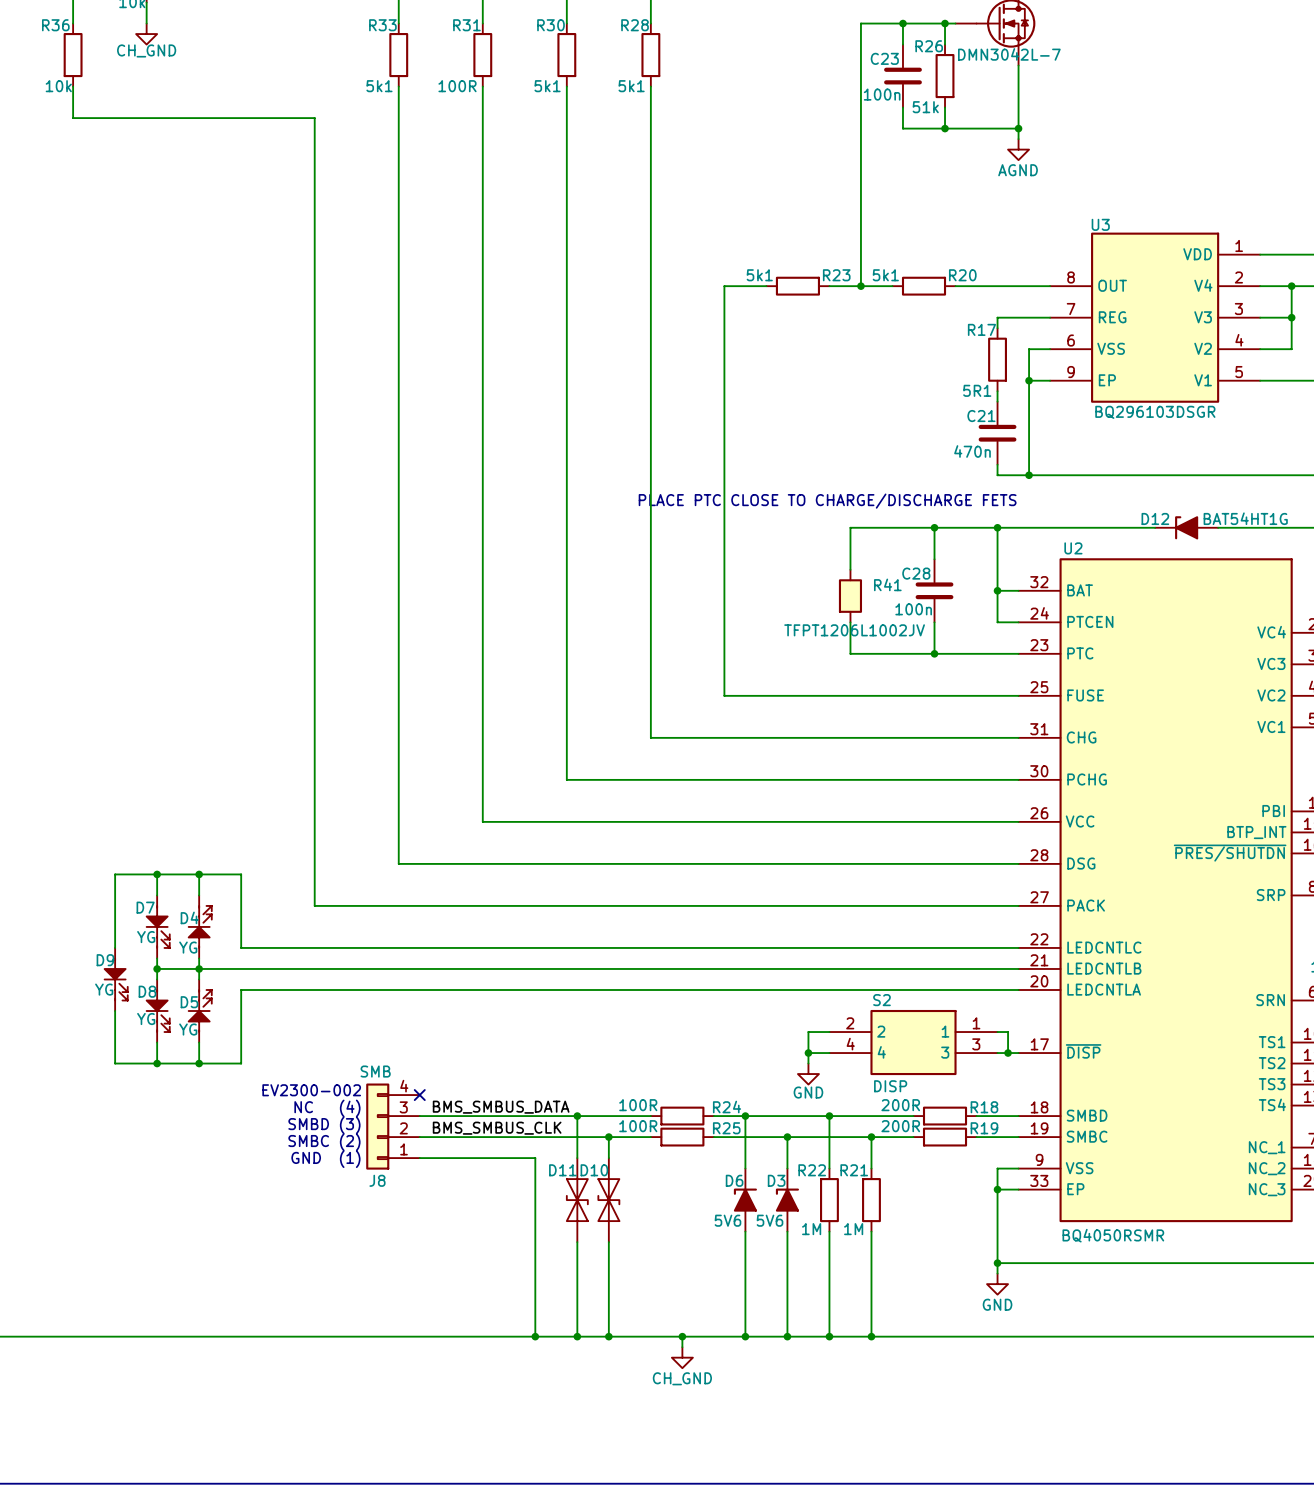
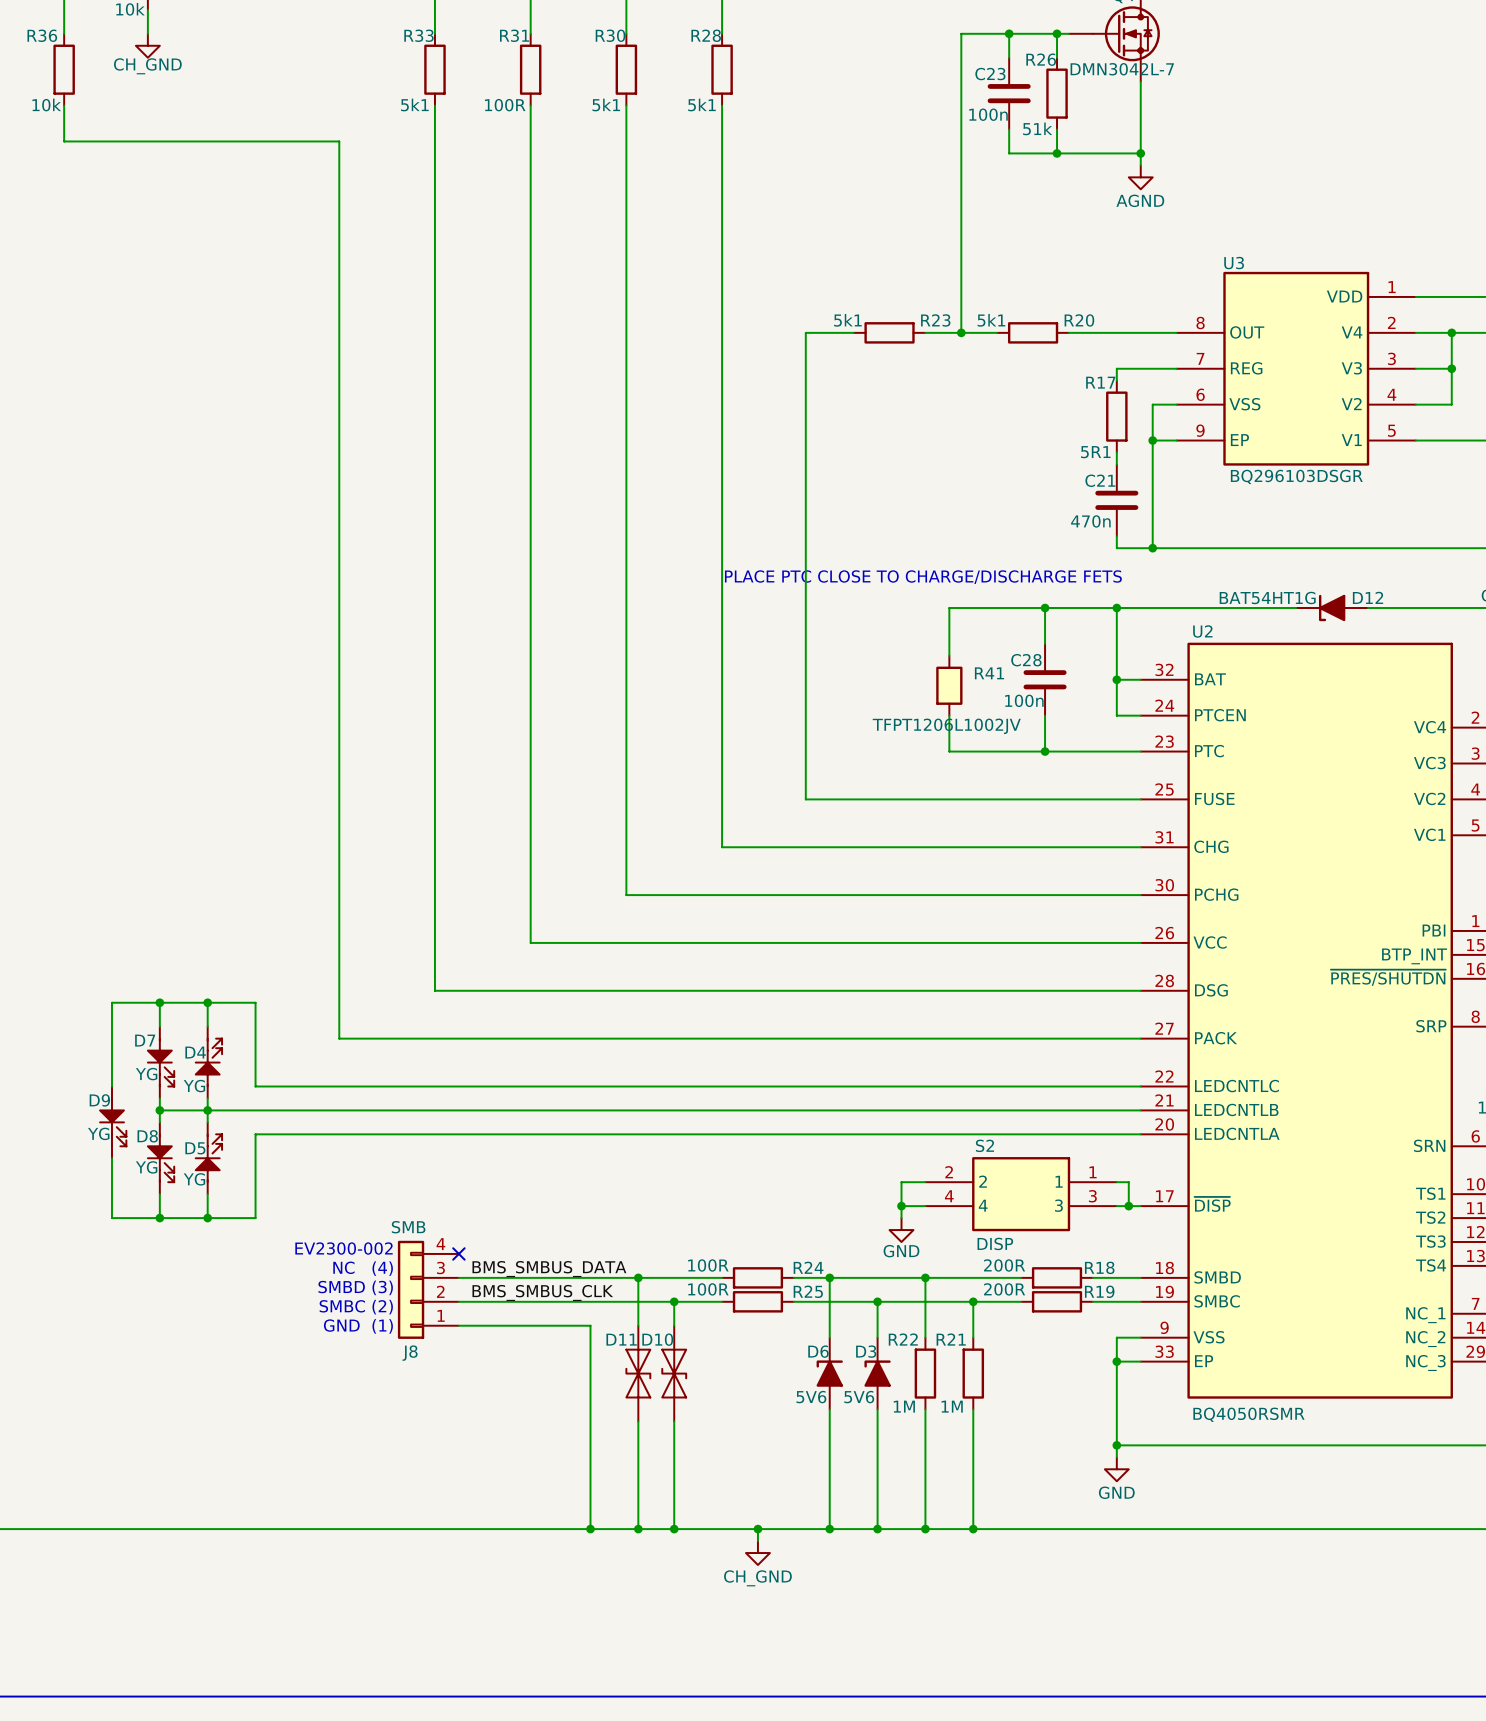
D12 name position: D12 (1155, 518) -> D12 (1368, 597)
D12 value position: BAT54HT1G (1245, 518) -> BAT54HT1G (1267, 597)
D12 flip: as is (1186, 527) -> up-down (1332, 608)

